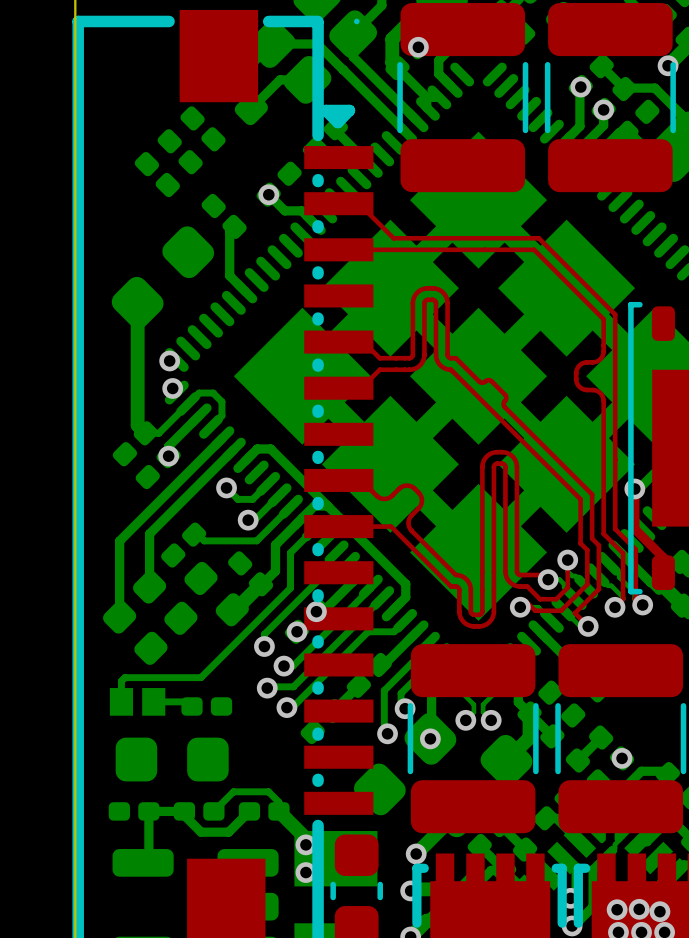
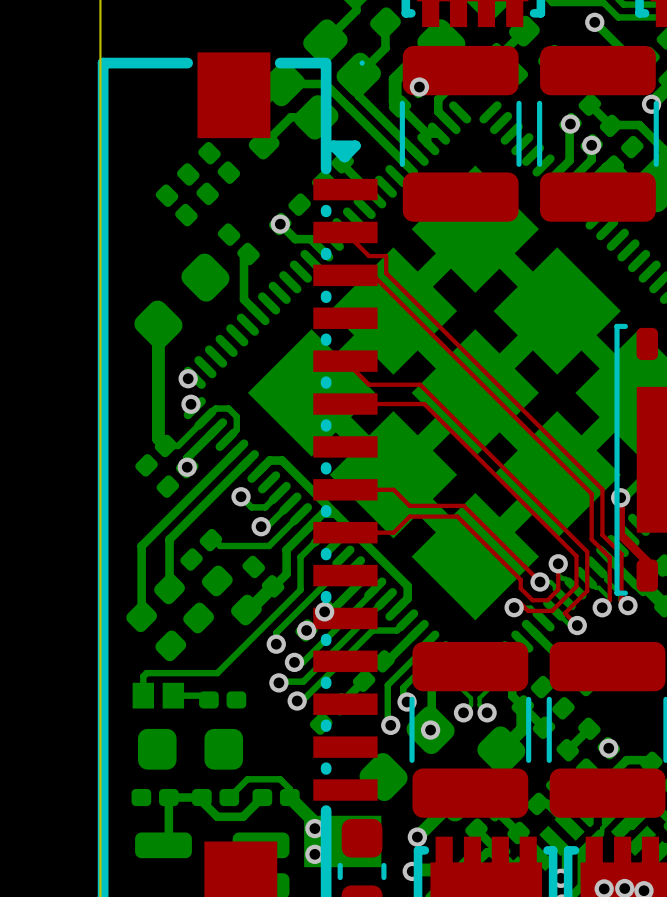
top track: (338, 203) (358, 203) (393, 238) (538, 238) (615, 314) (615, 459) -> (345, 232) (369, 256) (386, 256) (386, 273) (602, 489)
top track: (368, 249) (534, 249) (603, 319) (602, 356) (596, 361) (581, 364) (576, 373) (576, 381) (579, 386) (584, 389) (597, 391) (603, 398) (603, 484) -> (373, 275) (591, 493)
top track: (338, 342) (363, 342) (379, 358) (410, 357) (412, 354) (414, 297) (417, 292) (424, 288) (434, 288) (441, 291) (447, 301) (448, 356) (455, 358) (479, 382) (491, 381) (505, 395) (504, 406) (592, 494) (592, 538) (598, 547) -> (345, 361) (369, 384) (420, 384) (587, 551)
top track: (361, 388) (379, 369) (411, 369) (421, 363) (424, 354) (424, 302) (427, 299) (434, 300) (435, 354) (438, 362) (443, 367) (451, 369) (580, 499) (580, 543) (587, 551) -> (366, 404) (424, 404) (576, 556)
top track: (615, 459) (615, 480) -> none
top track: (361, 480) (381, 498) (389, 497) (405, 485) (412, 487) (419, 493) (421, 503) (409, 518) (409, 527) (455, 575) (467, 580) (470, 588) (471, 612) (479, 614) (482, 611) (482, 463) (485, 457) (492, 452) (508, 453) (513, 457) (516, 465) (517, 572) (519, 574) (543, 575) -> (366, 489) (393, 489) (409, 505) (463, 505) (535, 577)
top track: (391, 526) (451, 586) (458, 587) (459, 613) (463, 622) (472, 626) (486, 624) (491, 619) (493, 611) (493, 466) (496, 463) (503, 463) (505, 467) (505, 574) (513, 585) (527, 586) -> (393, 532) (409, 516) (457, 516) (520, 579) (520, 588)

